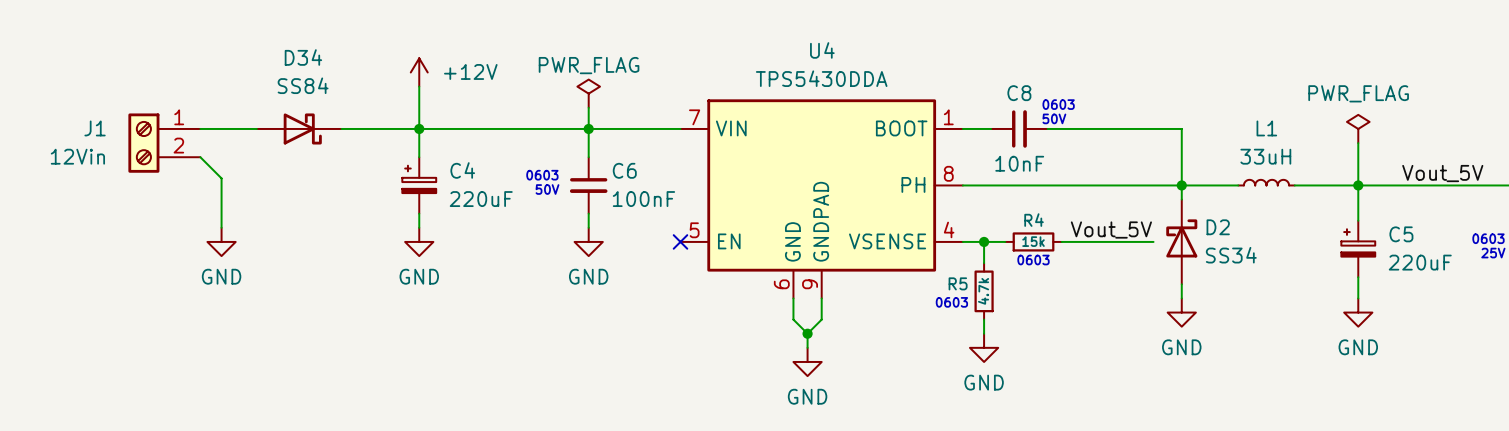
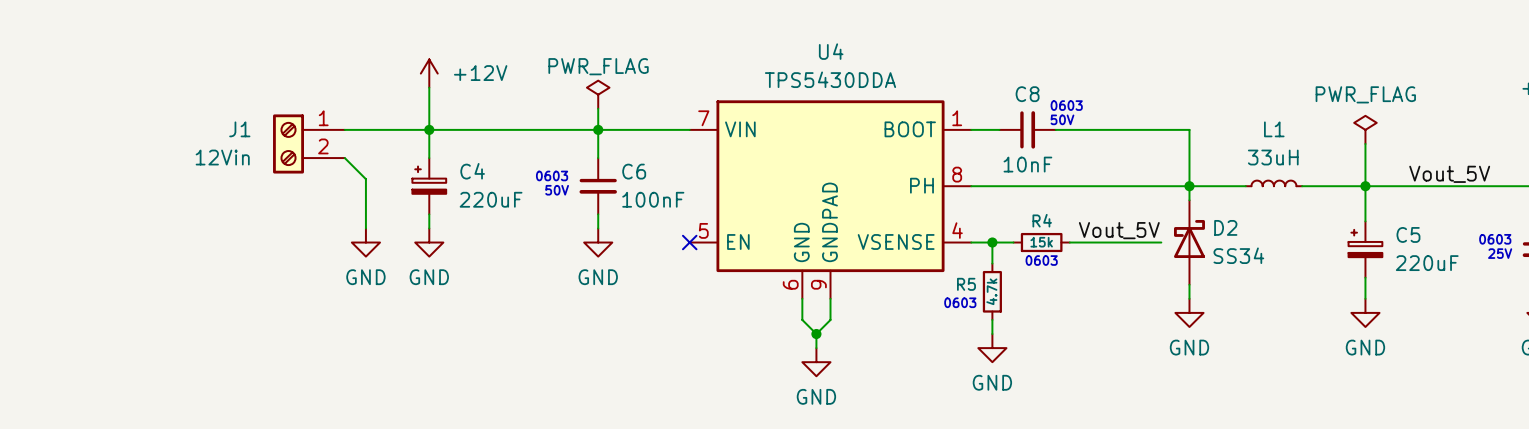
wire: (200, 128) (256, 128) -> none
D34: SS84 (299, 128) -> none
J1 position: (164, 143) -> (308, 143)
wire: (200, 157) (221, 178) (221, 227) -> (344, 158) (365, 179) (365, 228)
power symbol position: GND (221, 241) -> GND (365, 242)

